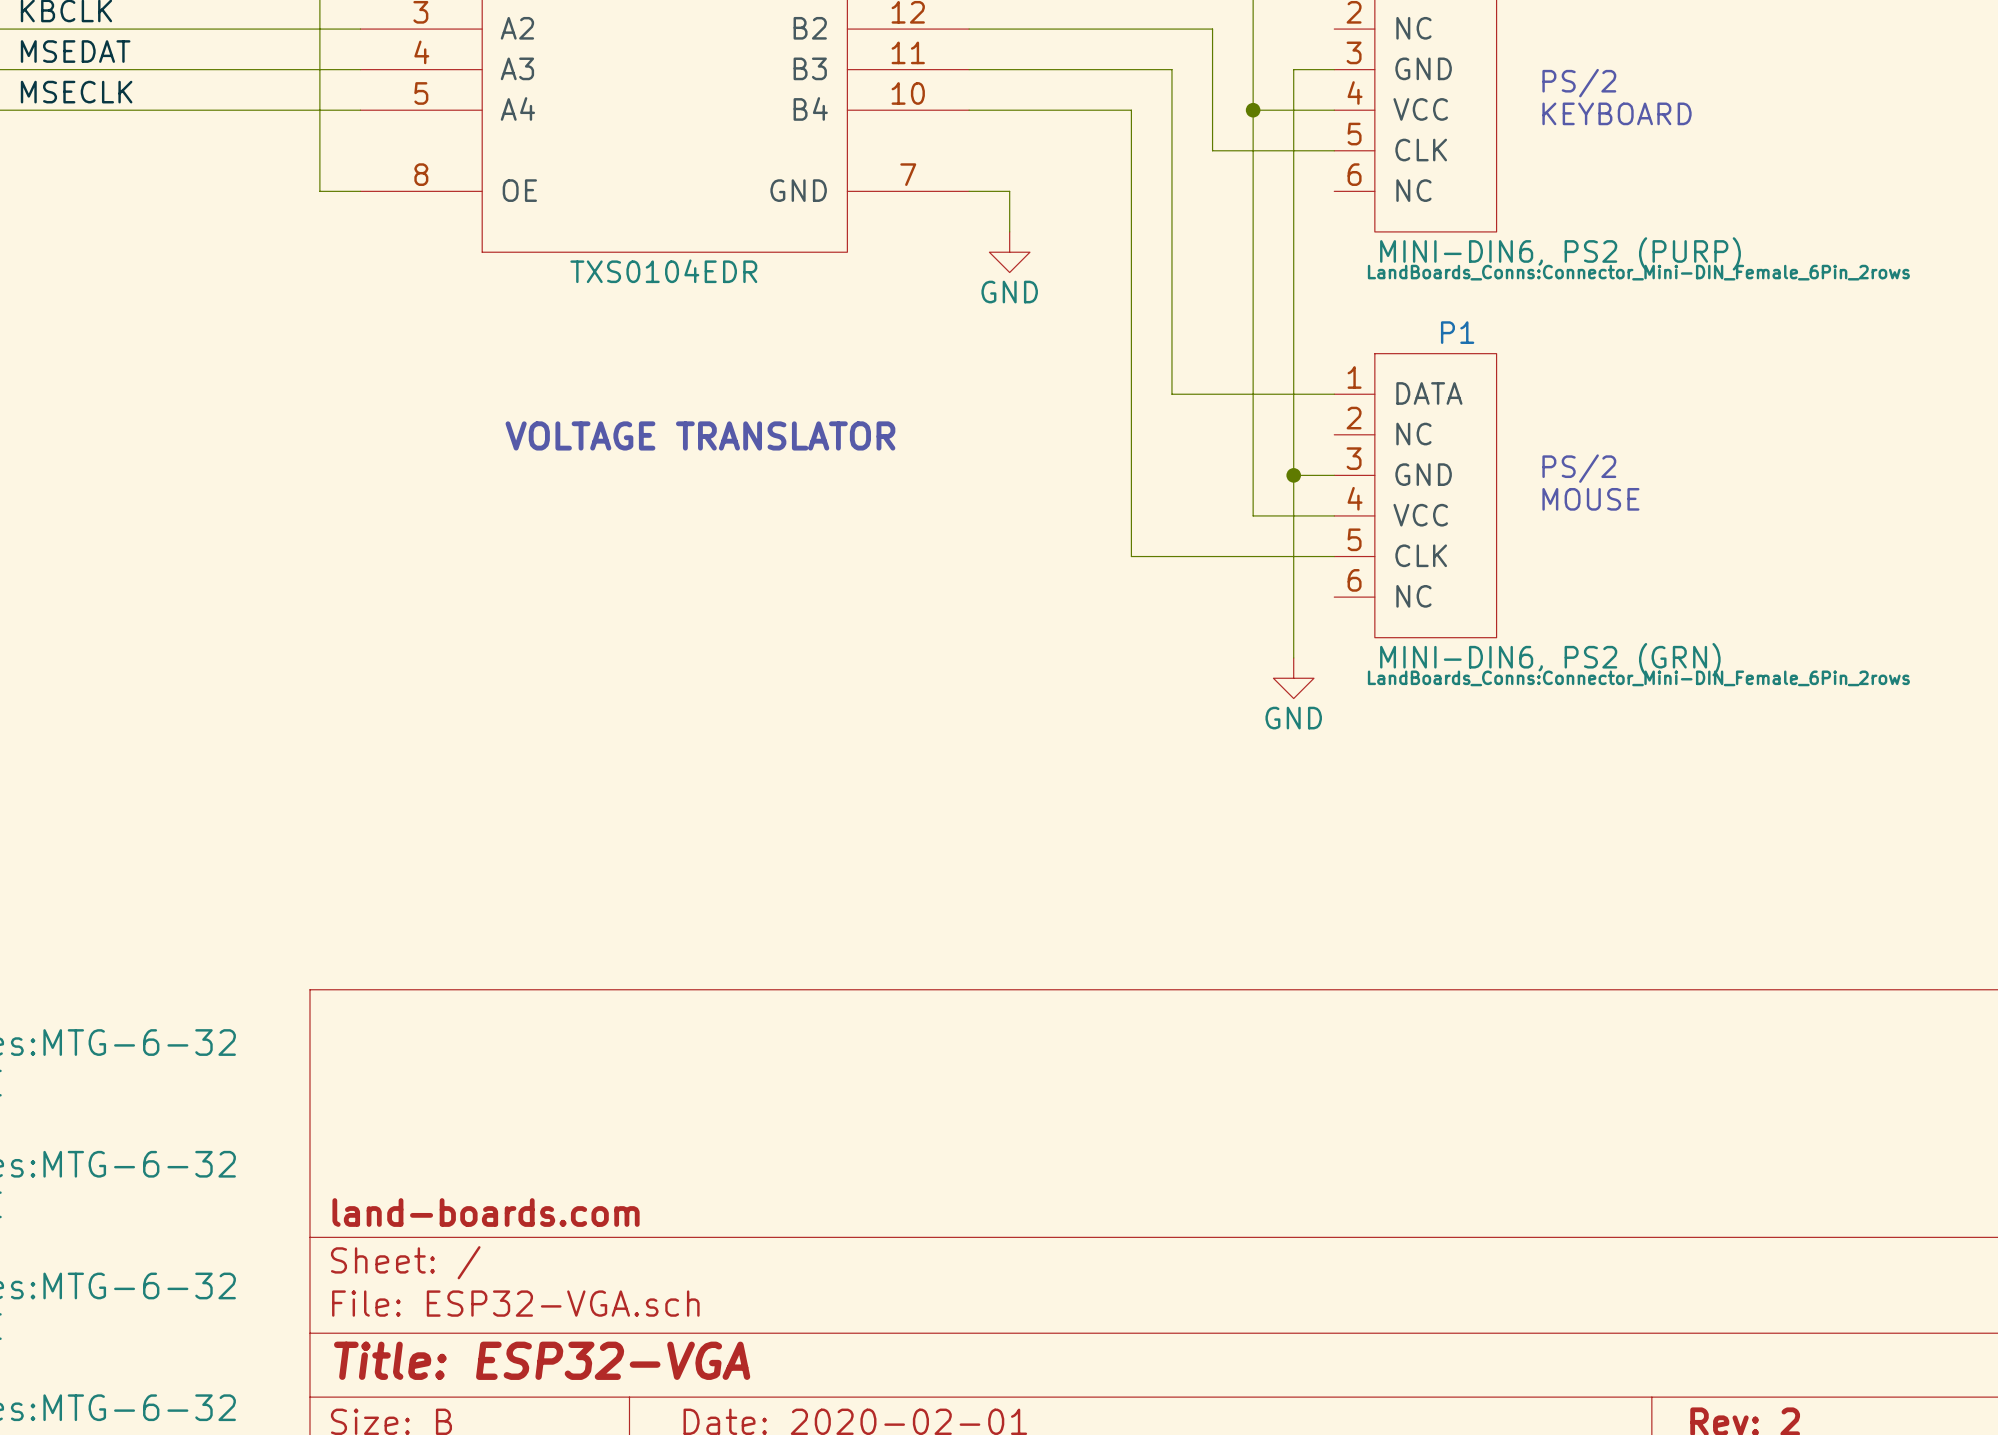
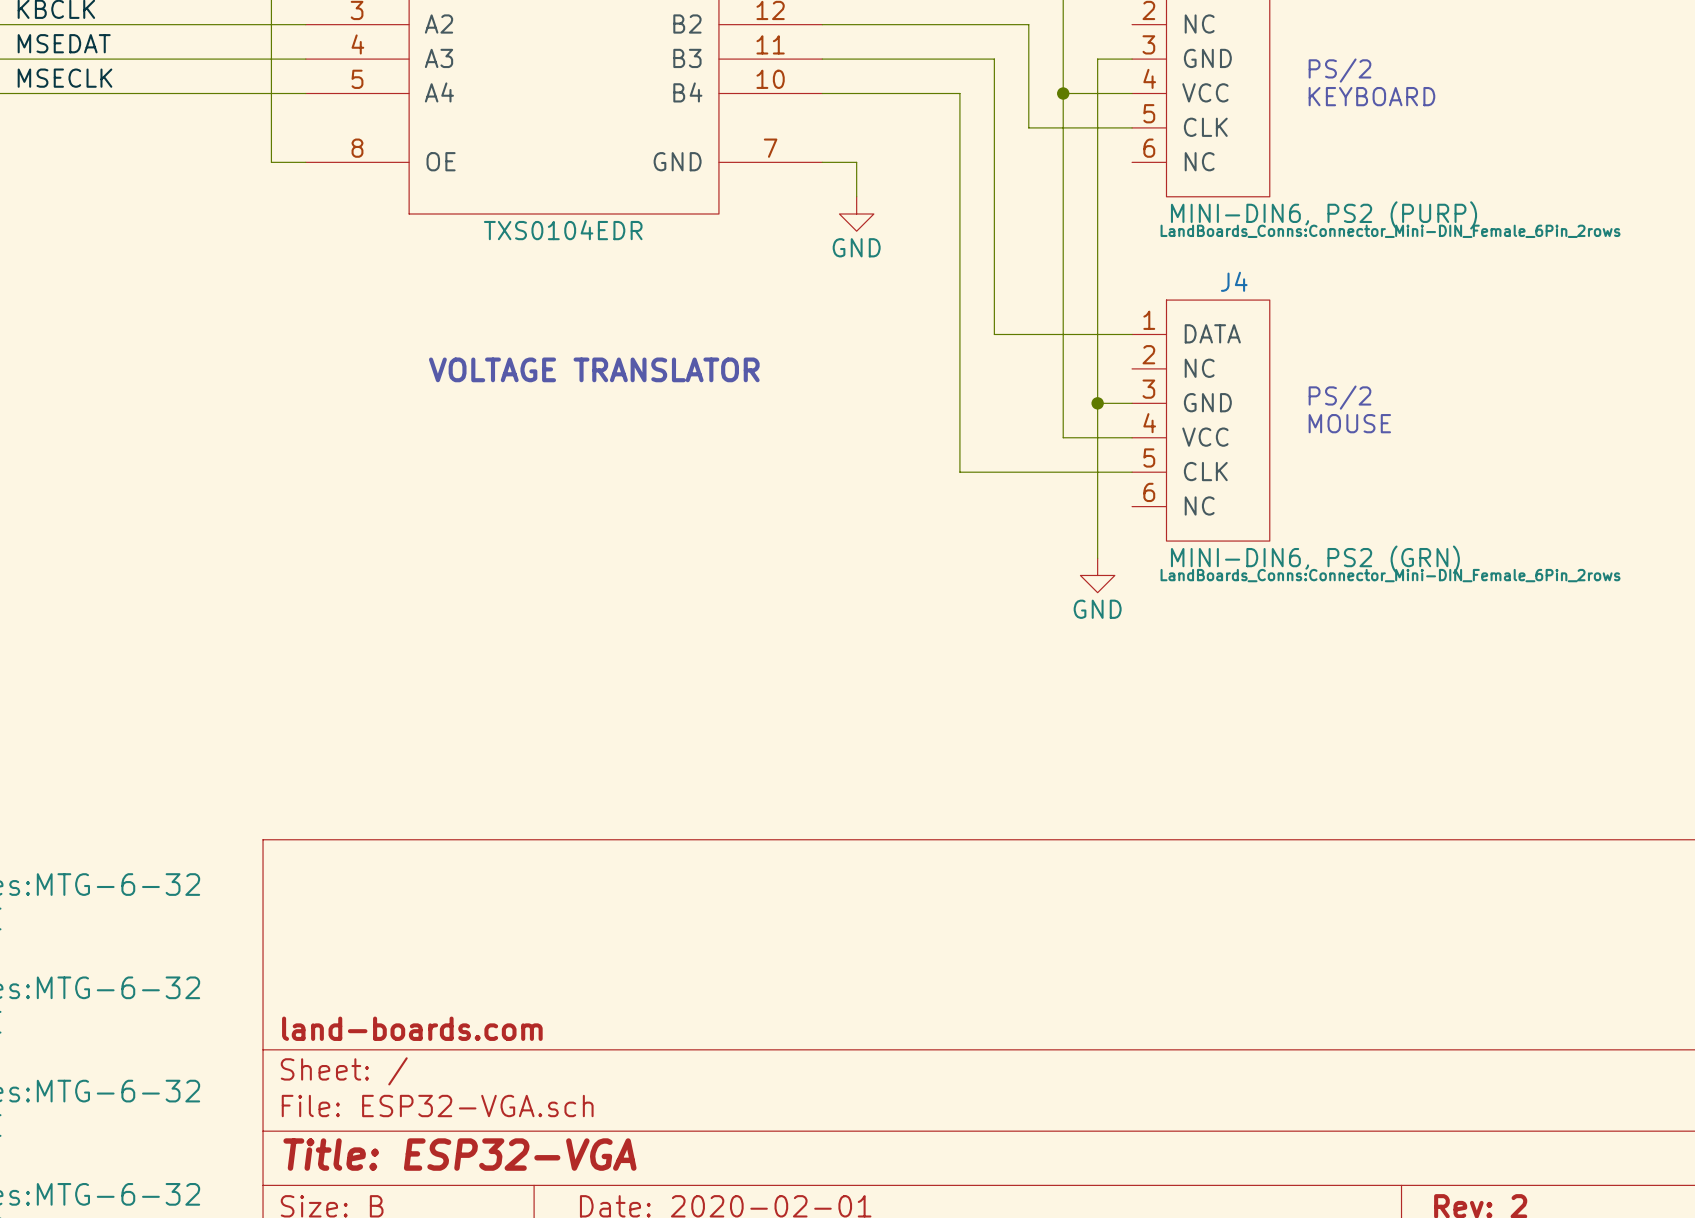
P1 name: P1 (1457, 332) -> J4 (1234, 281)

